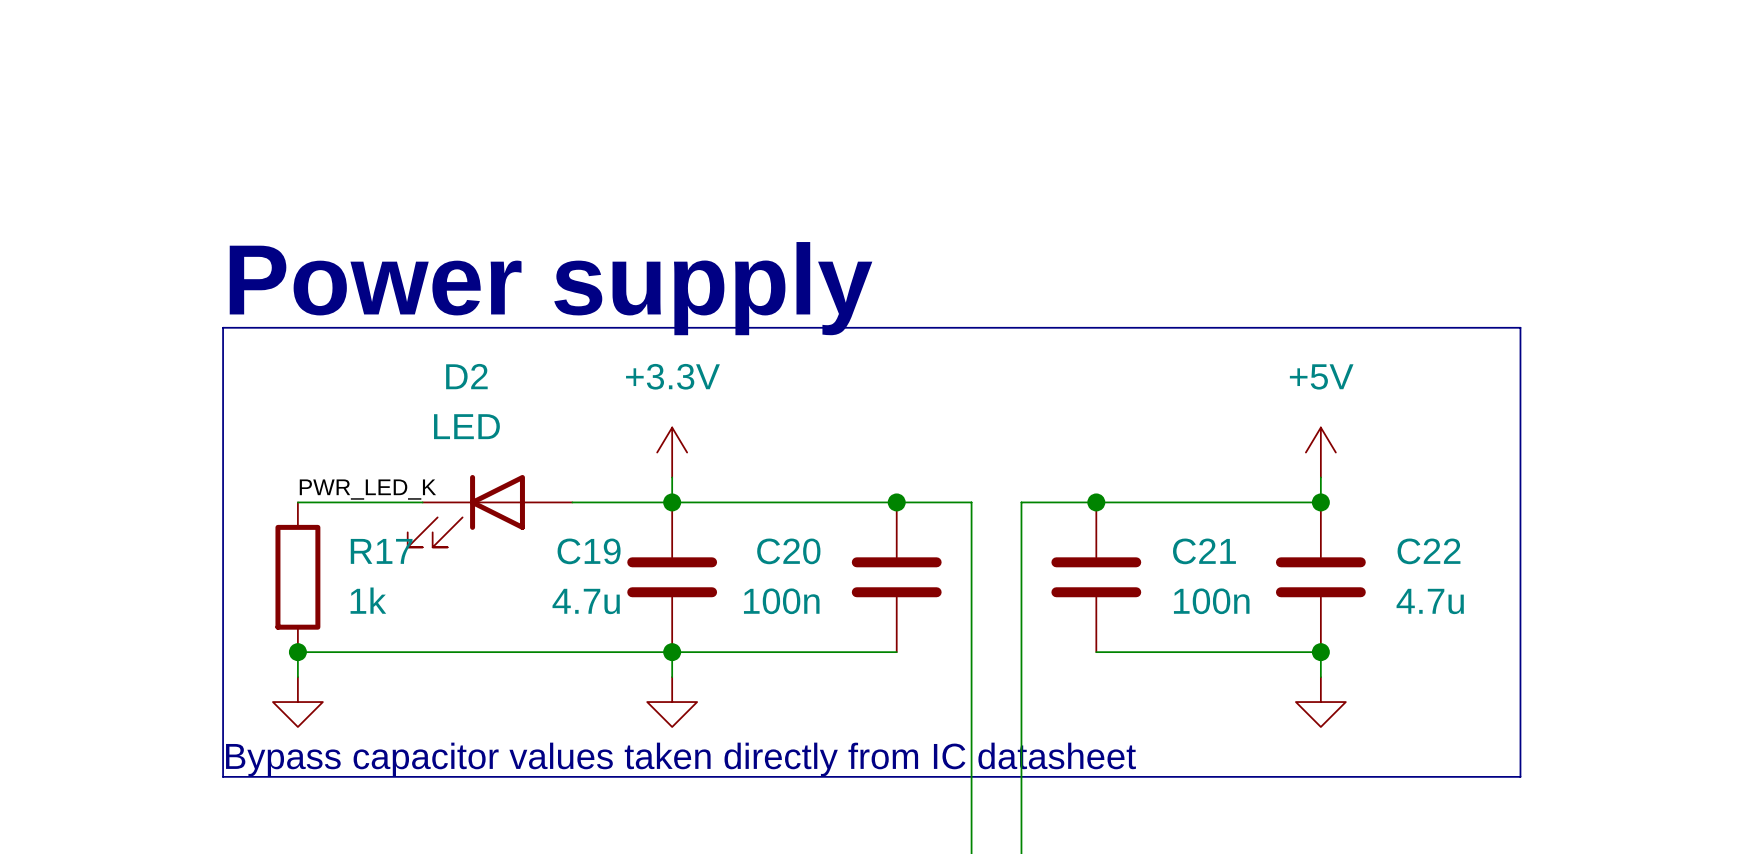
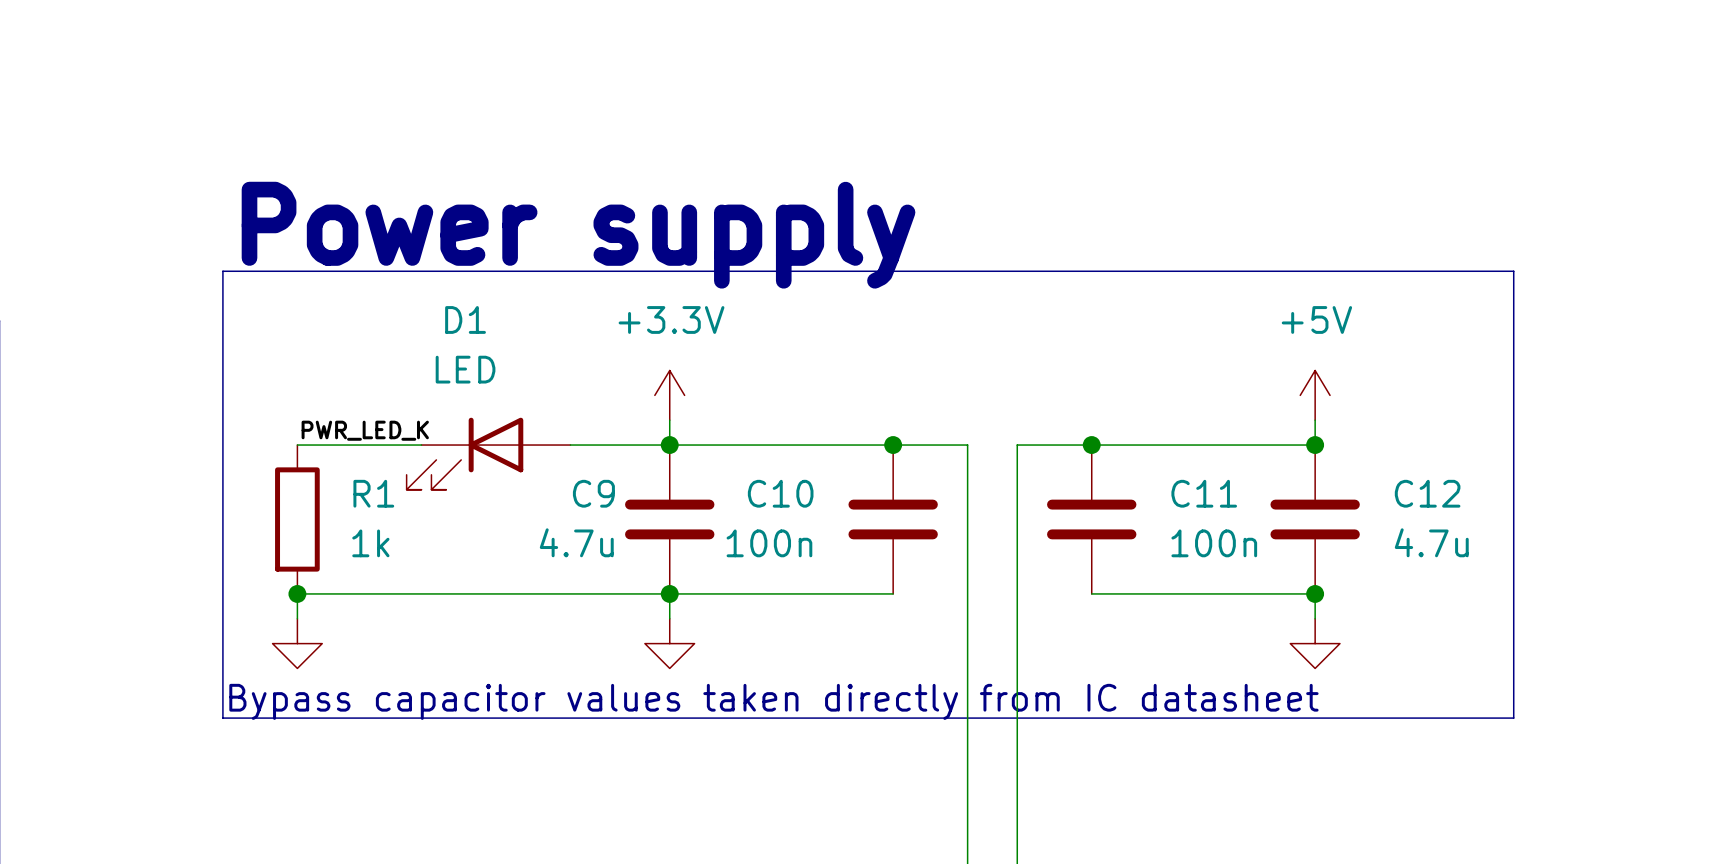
D2 name: D2 (466, 376) -> D1 (465, 319)
R17 name: R17 (381, 551) -> R1 (373, 493)
C19 name: C19 (589, 551) -> C9 (593, 493)
C20 name: C20 (788, 551) -> C10 (780, 493)
C21 name: C21 (1204, 551) -> C11 (1204, 493)
C22 name: C22 (1428, 551) -> C12 (1427, 493)

